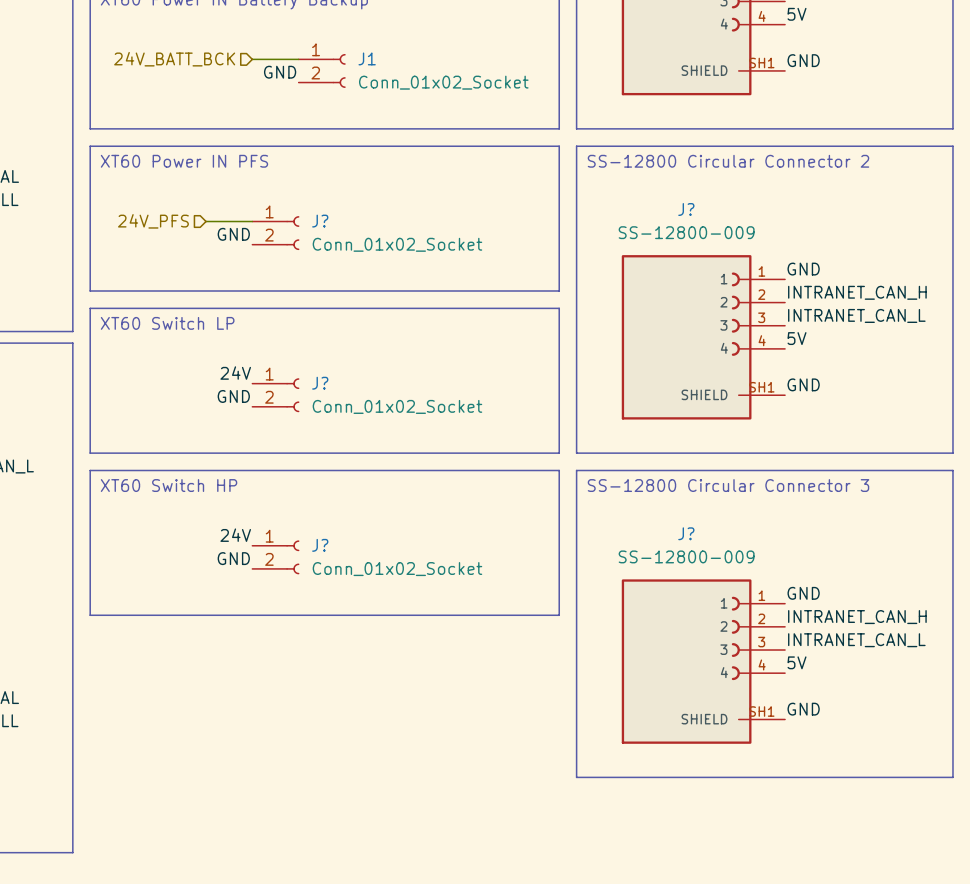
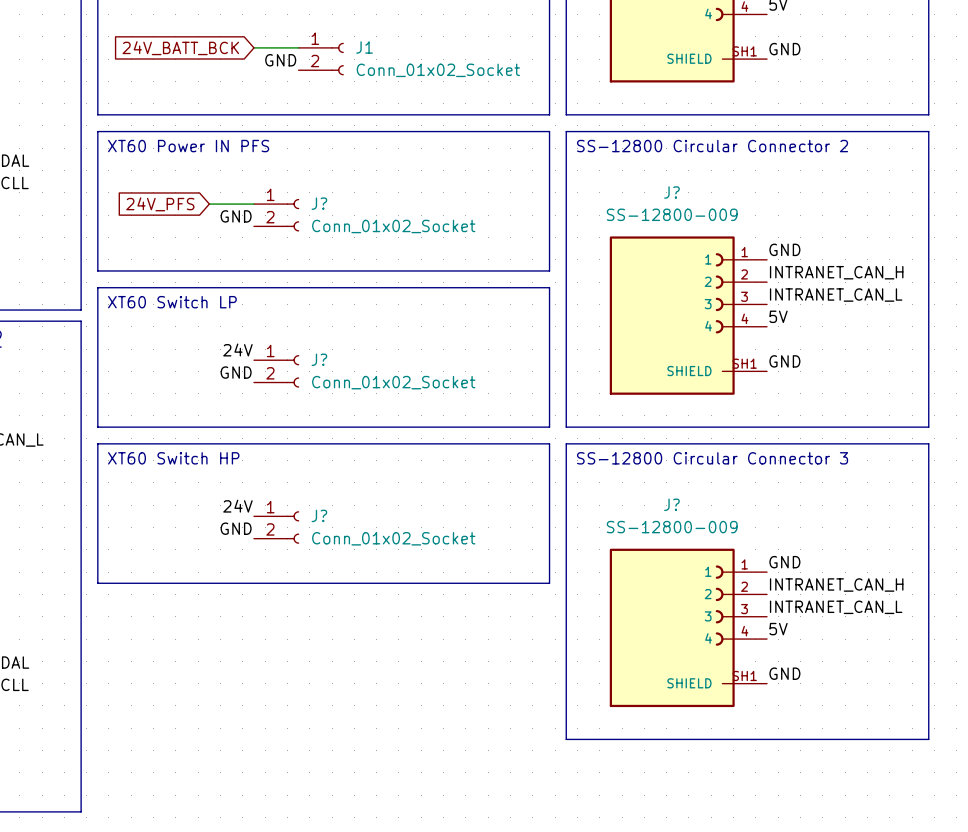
hierarchical label: 24V_BATT_BCK (174, 59) -> none
global label: none -> 24V_BATT_BCK (180, 48)
hierarchical label: 24V_PFS (153, 221) -> none
global label: none -> 24V_PFS (160, 204)

